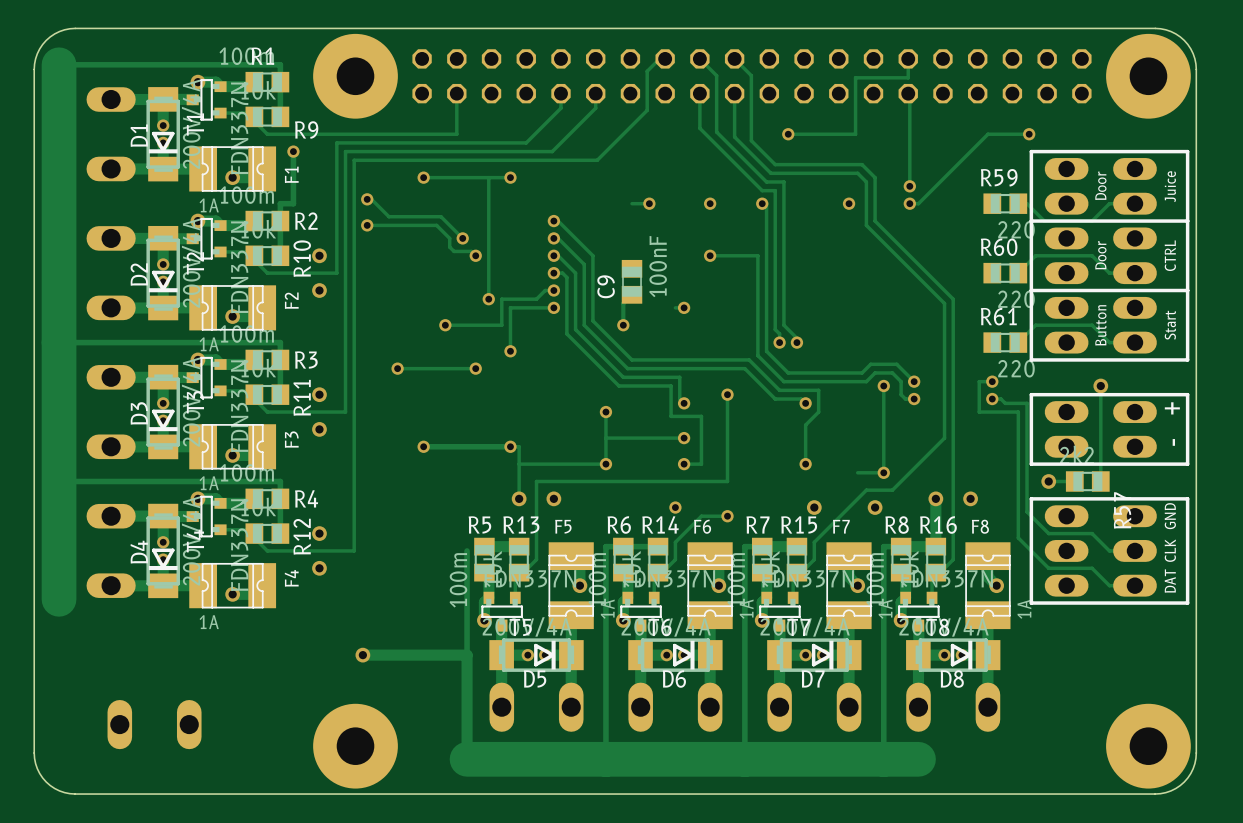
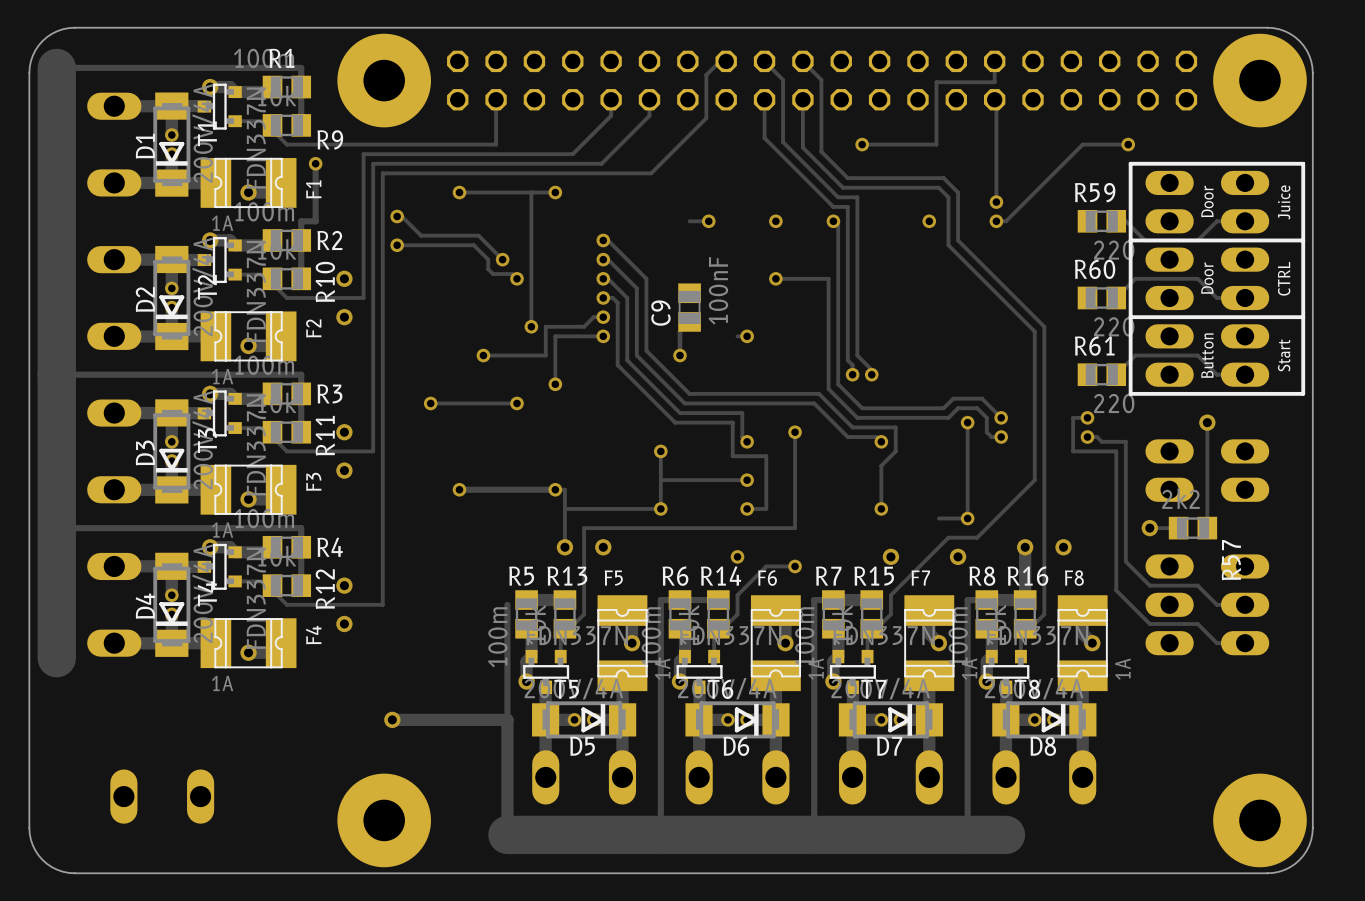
line: (1187, 394) (1031, 394) (1031, 464) (1187, 464) (1187, 394) -> none
text: + (1172, 408) -> none
text: - (1173, 442) -> none
line: (1187, 498) (1187, 603) (1031, 603) (1031, 498) (1187, 498) -> none
text: GND (1170, 516) -> none
text: CLK (1170, 550) -> none
text: DAT (1170, 581) -> none

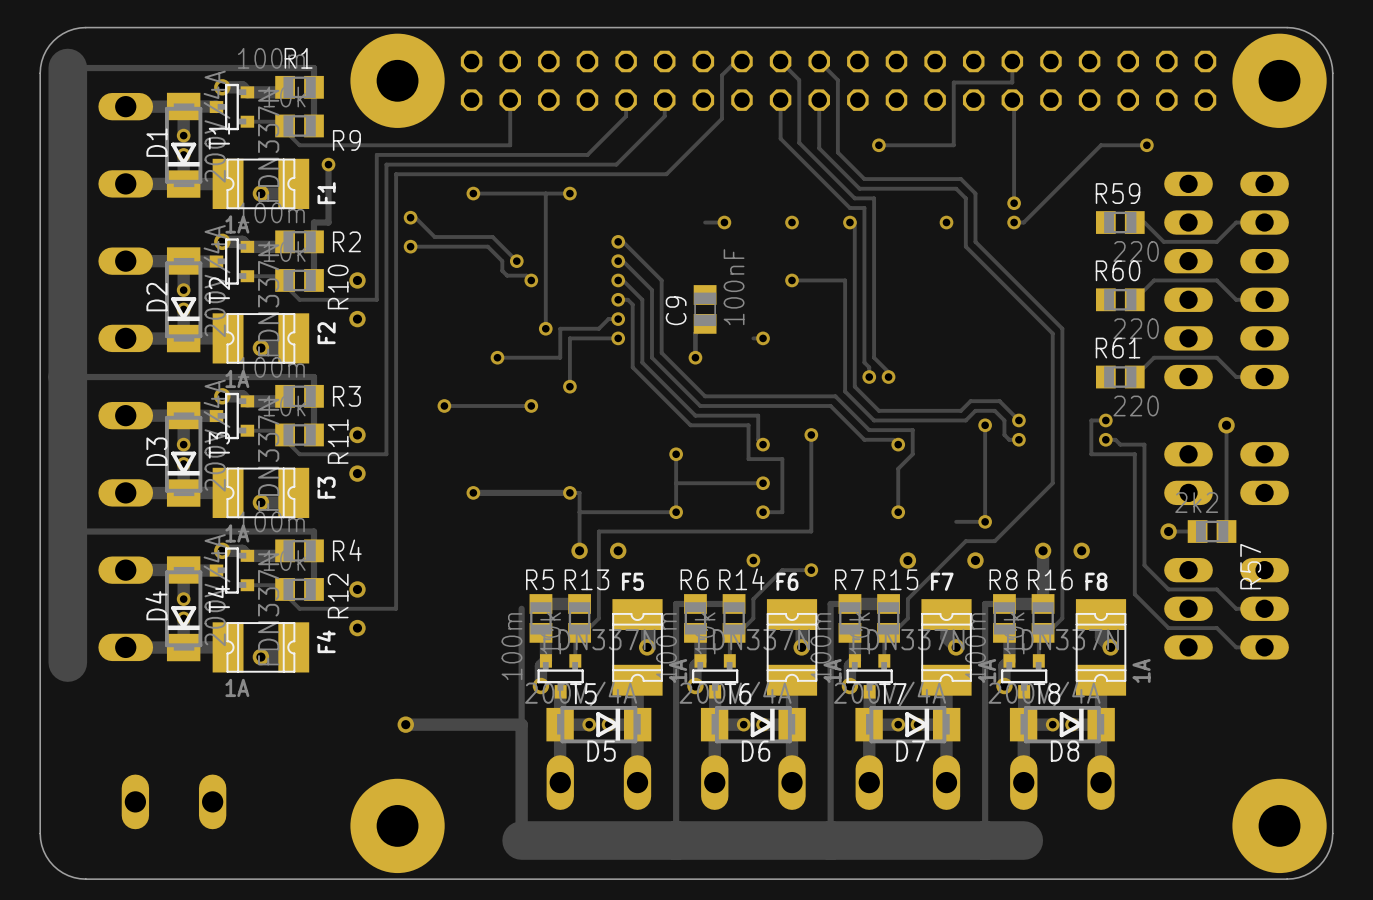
line: (1303, 163) (1130, 163) (1130, 393) (1303, 393) (1303, 163) -> none
text: Door (1207, 201) -> none
text: Juice (1284, 202) -> none
line: (1303, 240) (1130, 240) -> none
text: Door (1207, 278) -> none
text: CTRL (1284, 278) -> none
line: (1303, 317) (1130, 317) -> none
text: Button (1207, 355) -> none
text: Start (1284, 355) -> none

